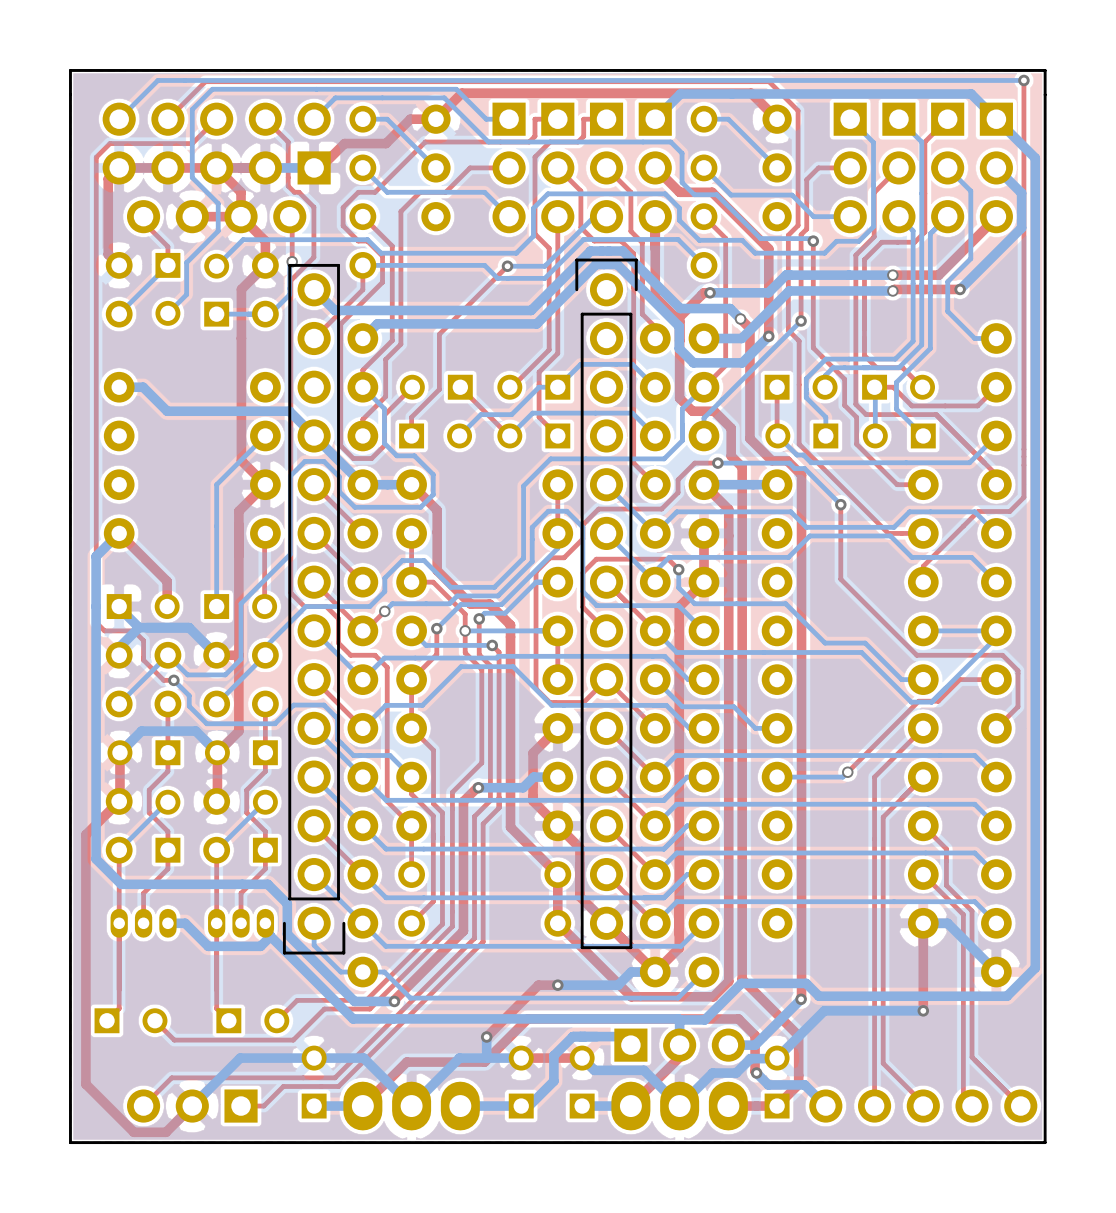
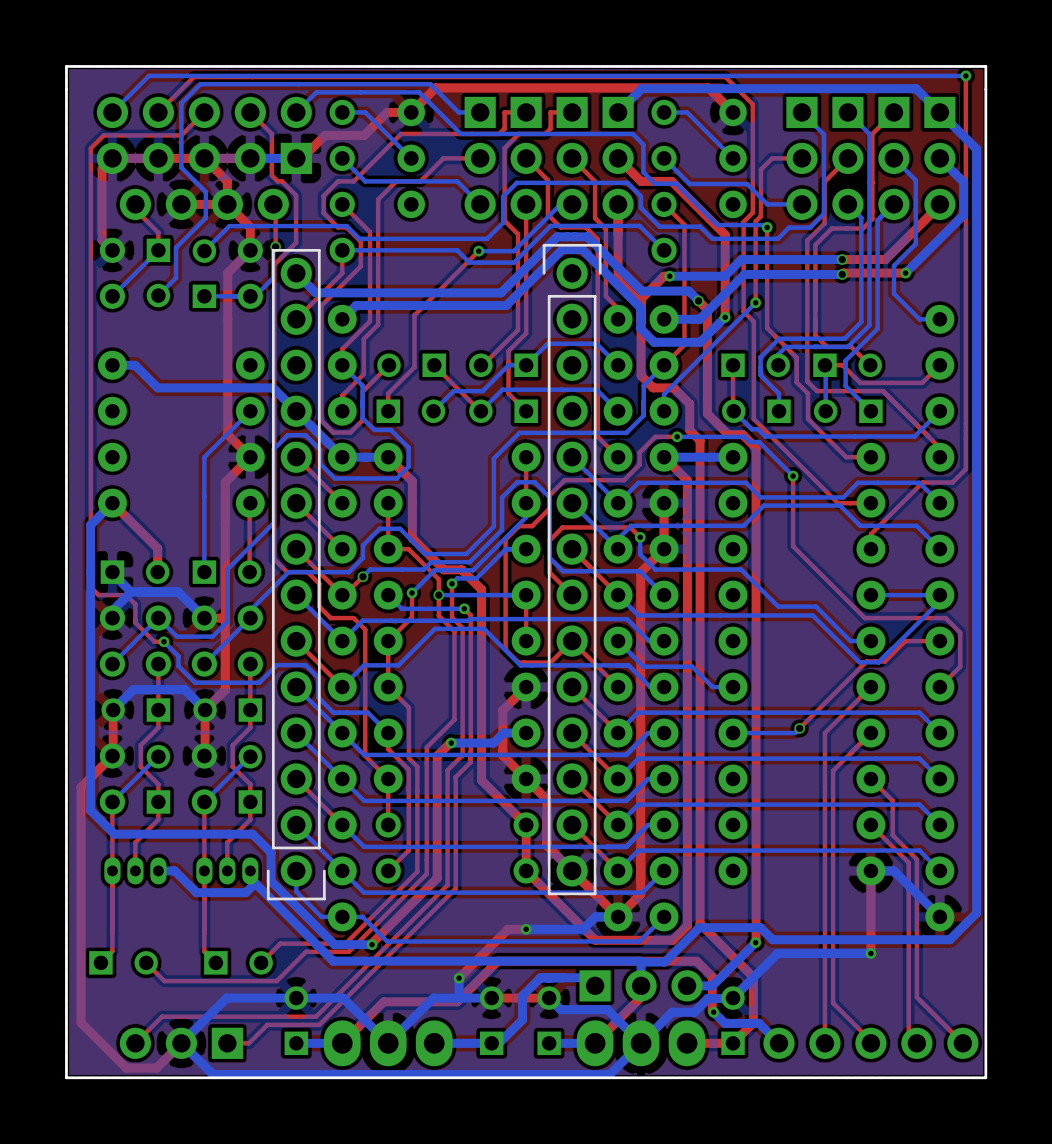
bottom track: none -> (641, 1043) (609, 1074) (213, 1074) (181, 1043)

